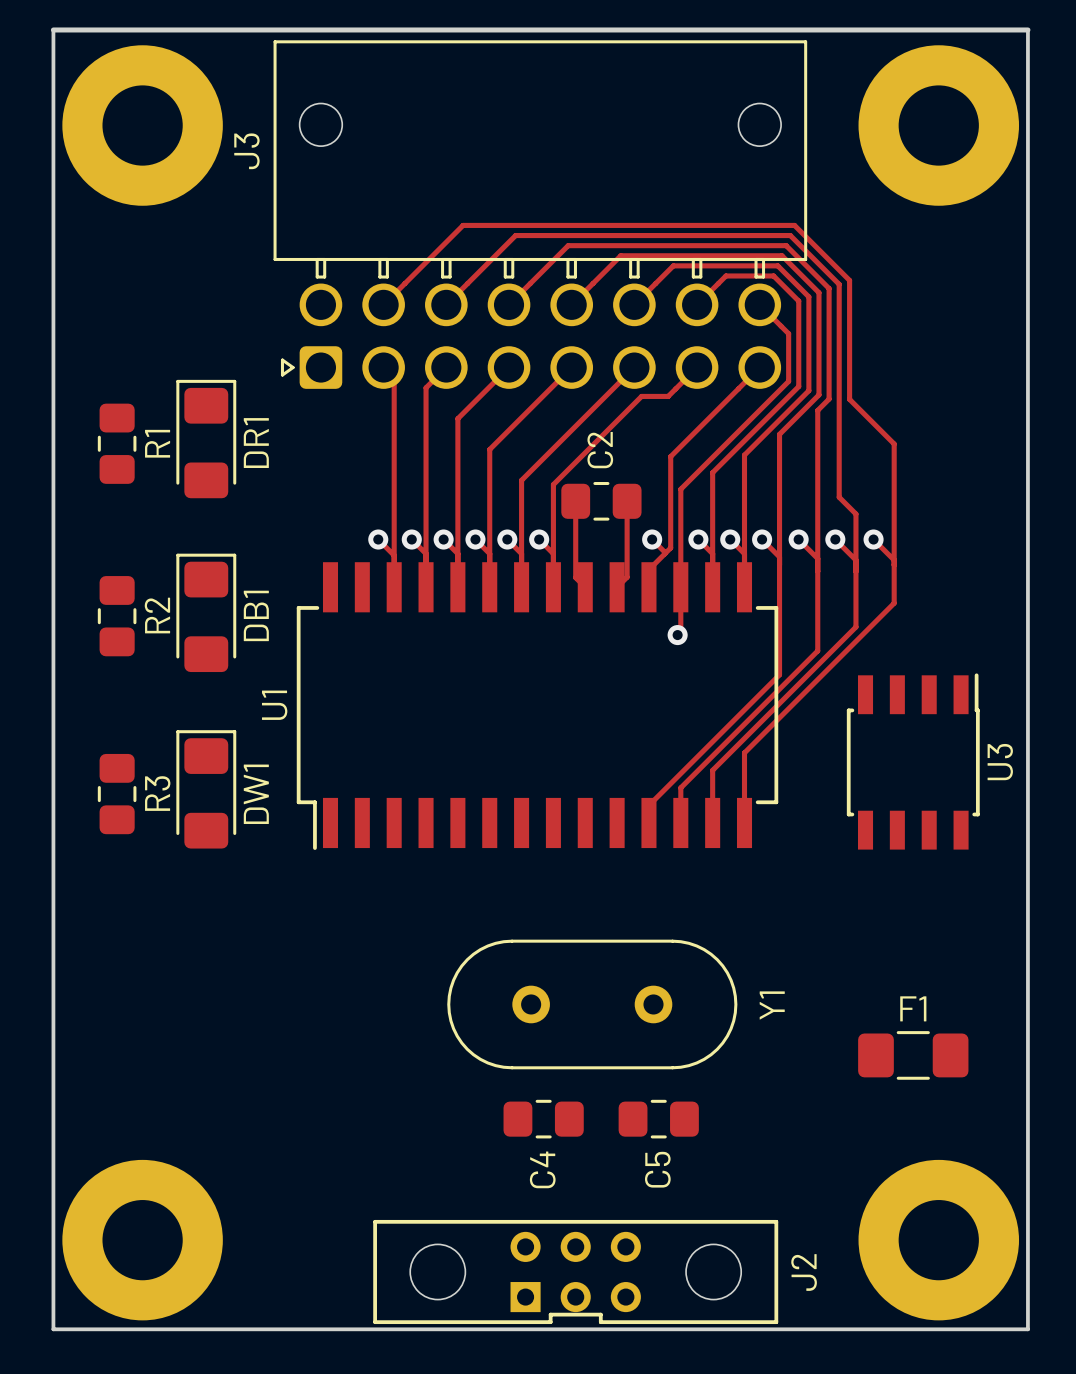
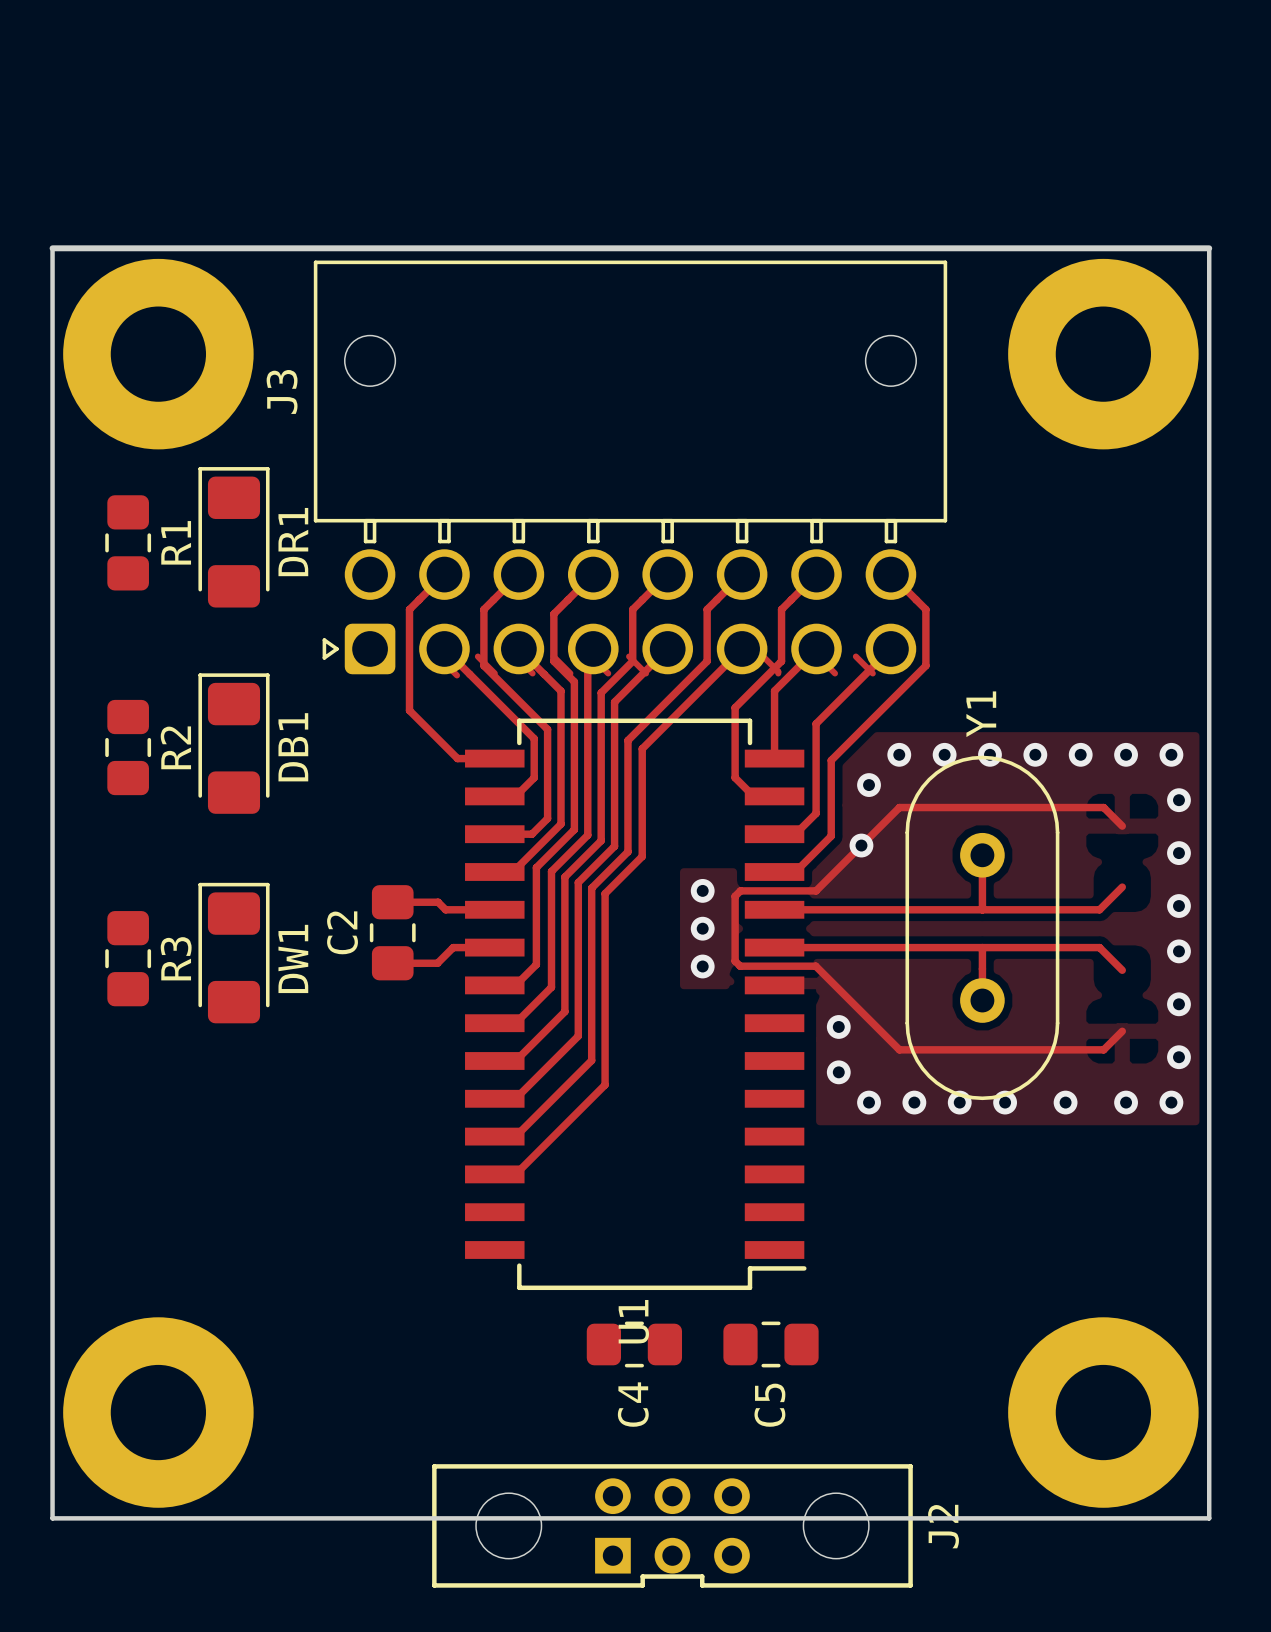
part position: (142, 125) -> (158, 354)
part position: (938, 125) -> (1103, 354)
board edge: (53, 195) (53, 29) (1027, 29) (1027, 195) -> (52, 248) (1209, 248)
J3 position: (540, 214) -> (630, 467)
track: (383, 304) (463, 225) (794, 225) (849, 280) (849, 399) (894, 443) (894, 603) (744, 752) (744, 822) -> none
track: (446, 304) (515, 235) (790, 235) (839, 284) (839, 497) (855, 514) (855, 627) (712, 770) (712, 822) -> none
track: (509, 304) (568, 245) (786, 245) (829, 288) (829, 399) (817, 410) (817, 650) (680, 787) (680, 822) -> none
track: (571, 304) (620, 255) (782, 255) (818, 292) (818, 394) (779, 434) (779, 674) (648, 805) (648, 822) -> none
track: (634, 304) (673, 265) (777, 265) (808, 296) (808, 390) (744, 455) (744, 587) -> none
track: (697, 304) (725, 275) (773, 275) (798, 301) (798, 386) (712, 472) (712, 587) -> none
track: (759, 304) (788, 333) (788, 381) (680, 489) (680, 631) (677, 635) -> none
track: (383, 367) (394, 378) (394, 587) -> none
track: (446, 367) (426, 387) (426, 587) -> none
track: (509, 367) (457, 418) (457, 587) -> none
track: (571, 367) (489, 449) (489, 587) -> none
track: (634, 367) (521, 480) (521, 587) -> none
track: (697, 367) (668, 396) (641, 396) (553, 484) (553, 587) -> none
track: (759, 367) (670, 456) (670, 547) (648, 569) (648, 587) -> none
C2 name position: C2 (600, 450) -> C2 (342, 932)
track: none -> (444, 574) (409, 609) (409, 710) (457, 758) (494, 758)
track: none -> (518, 574) (483, 609) (483, 665) (547, 729) (547, 818) (531, 834) (494, 834)
track: none -> (593, 574) (553, 614) (553, 661) (574, 681) (574, 829) (536, 867) (536, 964) (515, 985) (494, 985)
track: none -> (667, 574) (632, 609) (632, 661) (601, 692) (601, 840) (564, 877) (564, 1011) (515, 1060) (494, 1060)
track: none -> (742, 574) (707, 609) (707, 661) (627, 740) (627, 851) (591, 888) (591, 1060) (515, 1136) (494, 1136)
track: none -> (816, 574) (781, 609) (781, 661) (735, 707) (735, 777) (753, 796) (774, 796)
track: none -> (890, 574) (925, 609) (925, 665) (831, 760) (831, 836) (795, 871) (774, 871)
track: (575, 501) (575, 577) (585, 587) -> none
C2 rotation: 0° (601, 501) -> 90° clockwise (392, 932)
C2 position: (601, 501) -> (392, 932)
track: (627, 501) (627, 577) (617, 587) -> none
track: none -> (444, 648) (534, 738) (534, 777) (515, 796) (494, 796)
track: none -> (518, 648) (561, 691) (561, 824) (513, 871) (494, 871)
track: none -> (593, 648) (587, 654) (587, 835) (551, 871) (551, 987) (515, 1023) (494, 1023)
track: none -> (667, 648) (614, 702) (614, 846) (578, 882) (578, 1036) (515, 1098) (494, 1098)
track: none -> (742, 648) (642, 748) (642, 856) (605, 893) (605, 1084) (515, 1174) (494, 1174)
track: none -> (816, 648) (774, 690) (774, 758)
track: none -> (890, 648) (816, 723) (816, 813) (795, 834) (774, 834)
via: (378, 539) -> none
via: (411, 539) -> none
via: (443, 539) -> none
via: (475, 539) -> none
via: (507, 539) -> none
via: (539, 539) -> none
via: (652, 539) -> none
via: (698, 539) -> none
via: (730, 539) -> none
track: (762, 539) (779, 556) -> none
via: (762, 539) -> none
track: (798, 539) (817, 558) -> none
via: (798, 539) -> none
track: (835, 539) (855, 560) -> none
via: (835, 539) -> none
track: (873, 539) (894, 560) -> none
via: (873, 539) -> none
via: none -> (899, 754)
via: none -> (944, 754)
via: none -> (989, 754)
via: none -> (1035, 754)
via: none -> (1080, 754)
via: none -> (1126, 754)
via: none -> (1171, 754)
via: (677, 635) -> none
via: none -> (869, 785)
via: none -> (1178, 800)
track: none -> (1122, 826) (1103, 807) (899, 807) (816, 890) (740, 890) (735, 896) (735, 961) (740, 966) (815, 966) (899, 1049) (1103, 1049) (1122, 1031)
via: none -> (861, 845)
via: none -> (1178, 853)
U1 rotation: 0° (537, 706) -> 90° counterclockwise (635, 1004)
track: none -> (982, 855) (982, 909)
track: none -> (1122, 887) (1099, 909) (774, 909)
via: none -> (702, 890)
track: none -> (392, 902) (438, 902) (445, 909) (494, 909)
via: none -> (1178, 906)
U3: (913, 761) -> none
via: none -> (702, 928)
track: none -> (494, 947) (453, 947) (437, 963) (392, 963)
track: none -> (774, 947) (1099, 947) (1122, 970)
track: none -> (982, 947) (982, 1000)
via: none -> (1178, 951)
via: none -> (702, 966)
via: none -> (1178, 1004)
via: none -> (838, 1026)
via: none -> (1178, 1057)
via: none -> (838, 1072)
via: none -> (869, 1102)
via: none -> (914, 1102)
via: none -> (959, 1102)
via: none -> (1005, 1102)
via: none -> (1065, 1102)
via: none -> (1126, 1102)
via: none -> (1171, 1102)
Y1 rotation: 0° (592, 1004) -> 90° clockwise (982, 927)
Y1 position: (592, 1004) -> (982, 927)
Y1 name position: Y1 (772, 1005) -> Y1 (981, 714)
F1: (913, 1055) -> none
part position: (142, 1240) -> (158, 1412)
part position: (938, 1240) -> (1103, 1412)
board edge: (53, 1265) (53, 1329) (1027, 1329) (1027, 1265) -> (52, 1518) (1209, 1518)

